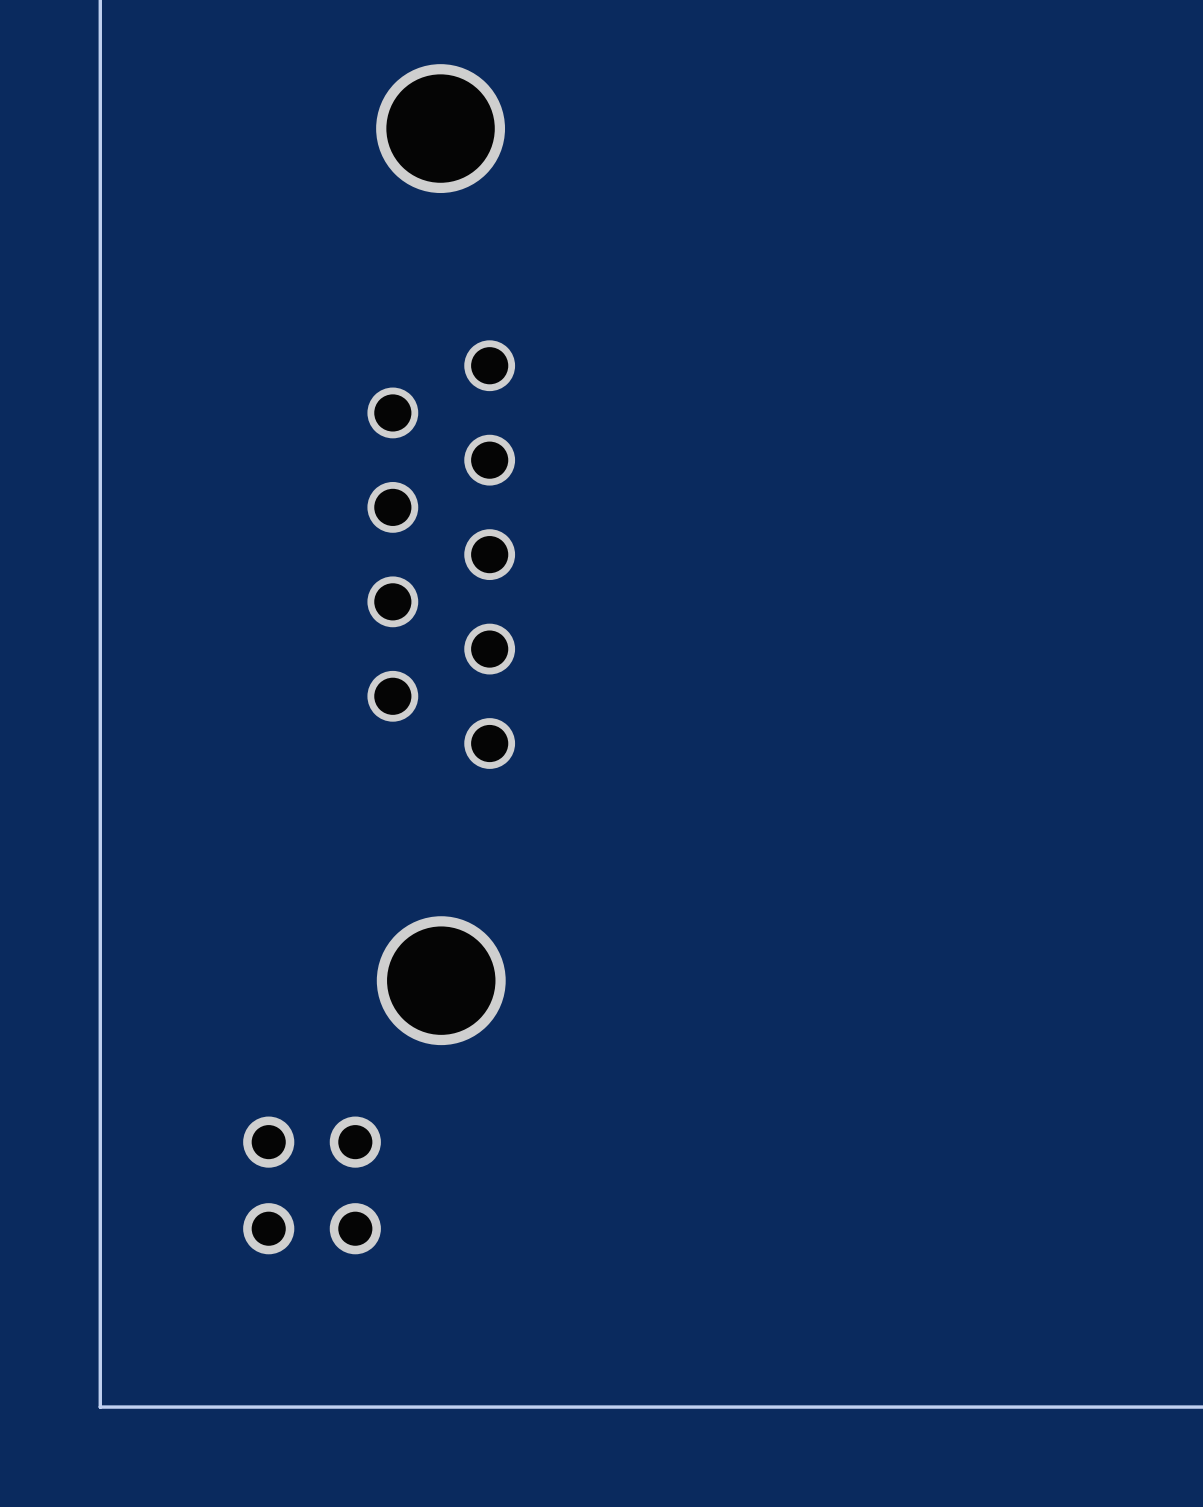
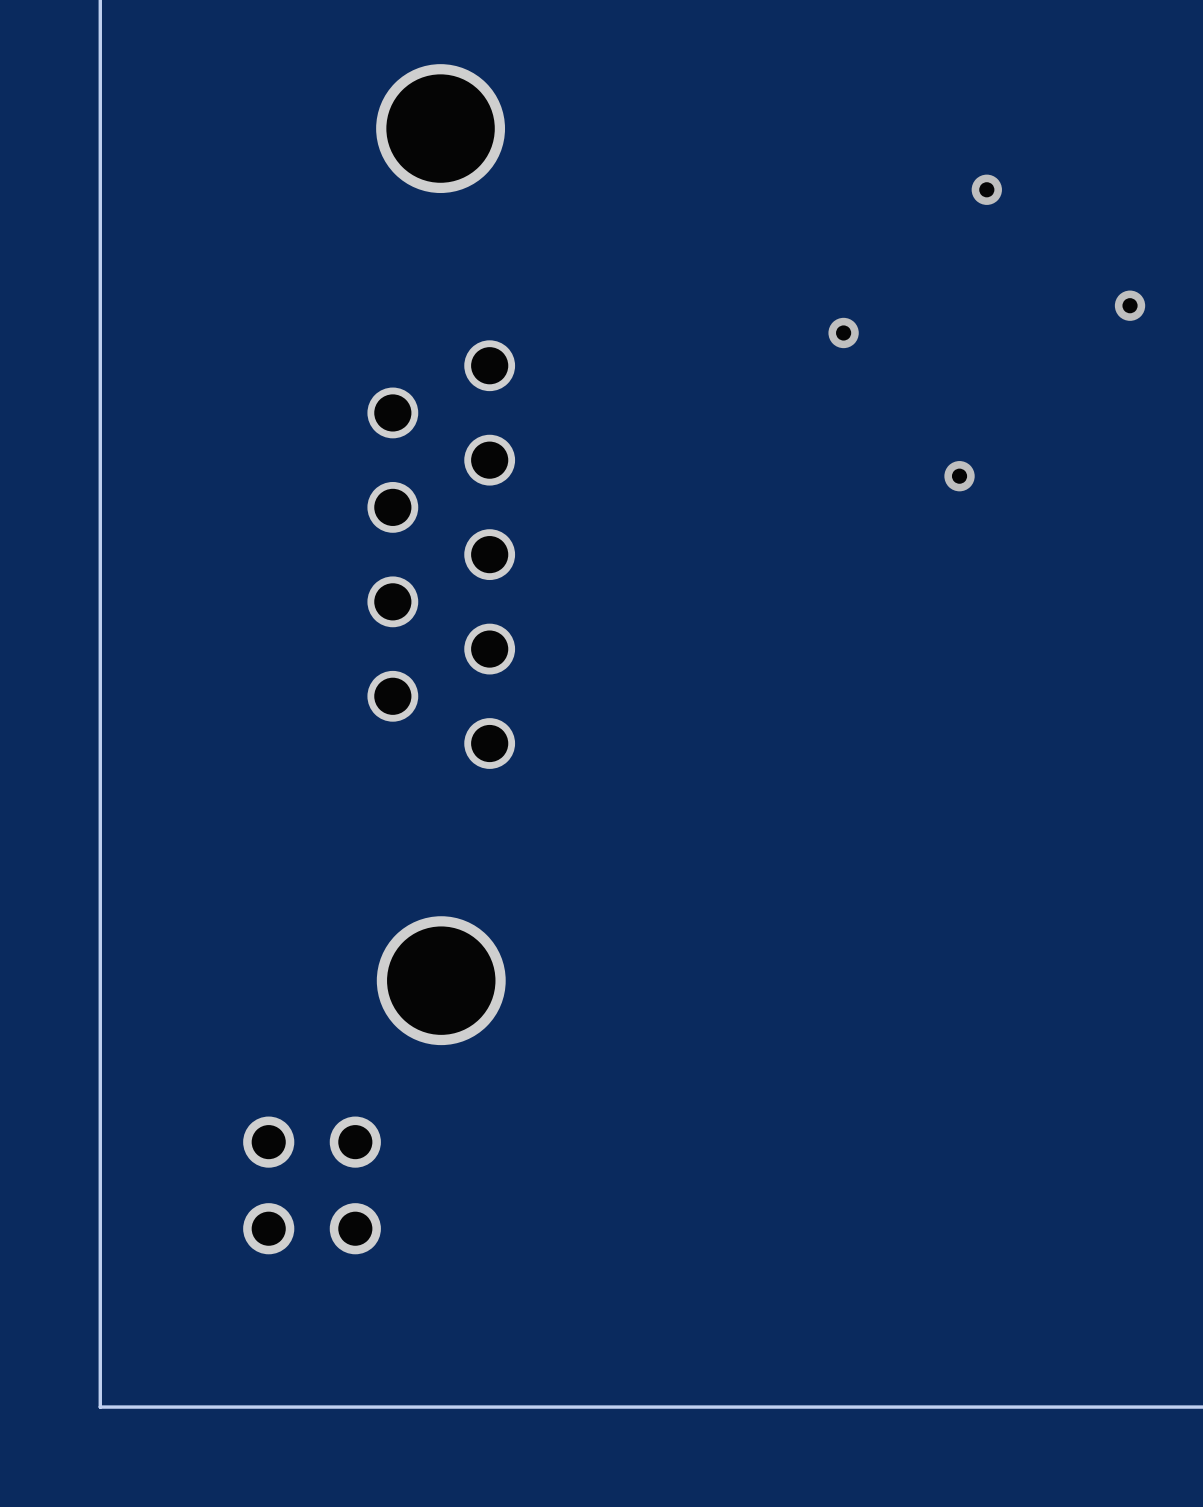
via: none -> (986, 189)
via: none -> (1130, 305)
via: none -> (843, 332)
via: none -> (959, 476)

